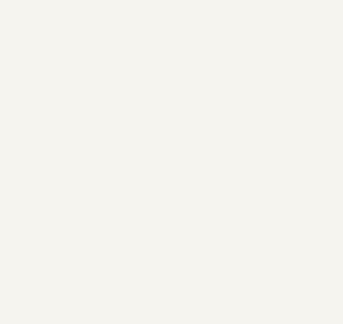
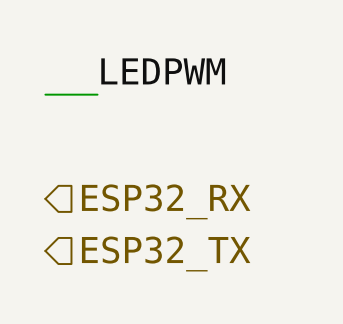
label: none -> LEDPWM (163, 71)
wire: none -> (45, 94) (97, 94)
hierarchical label: none -> ESP32_RX (166, 201)
hierarchical label: none -> ESP32_TX (166, 253)

